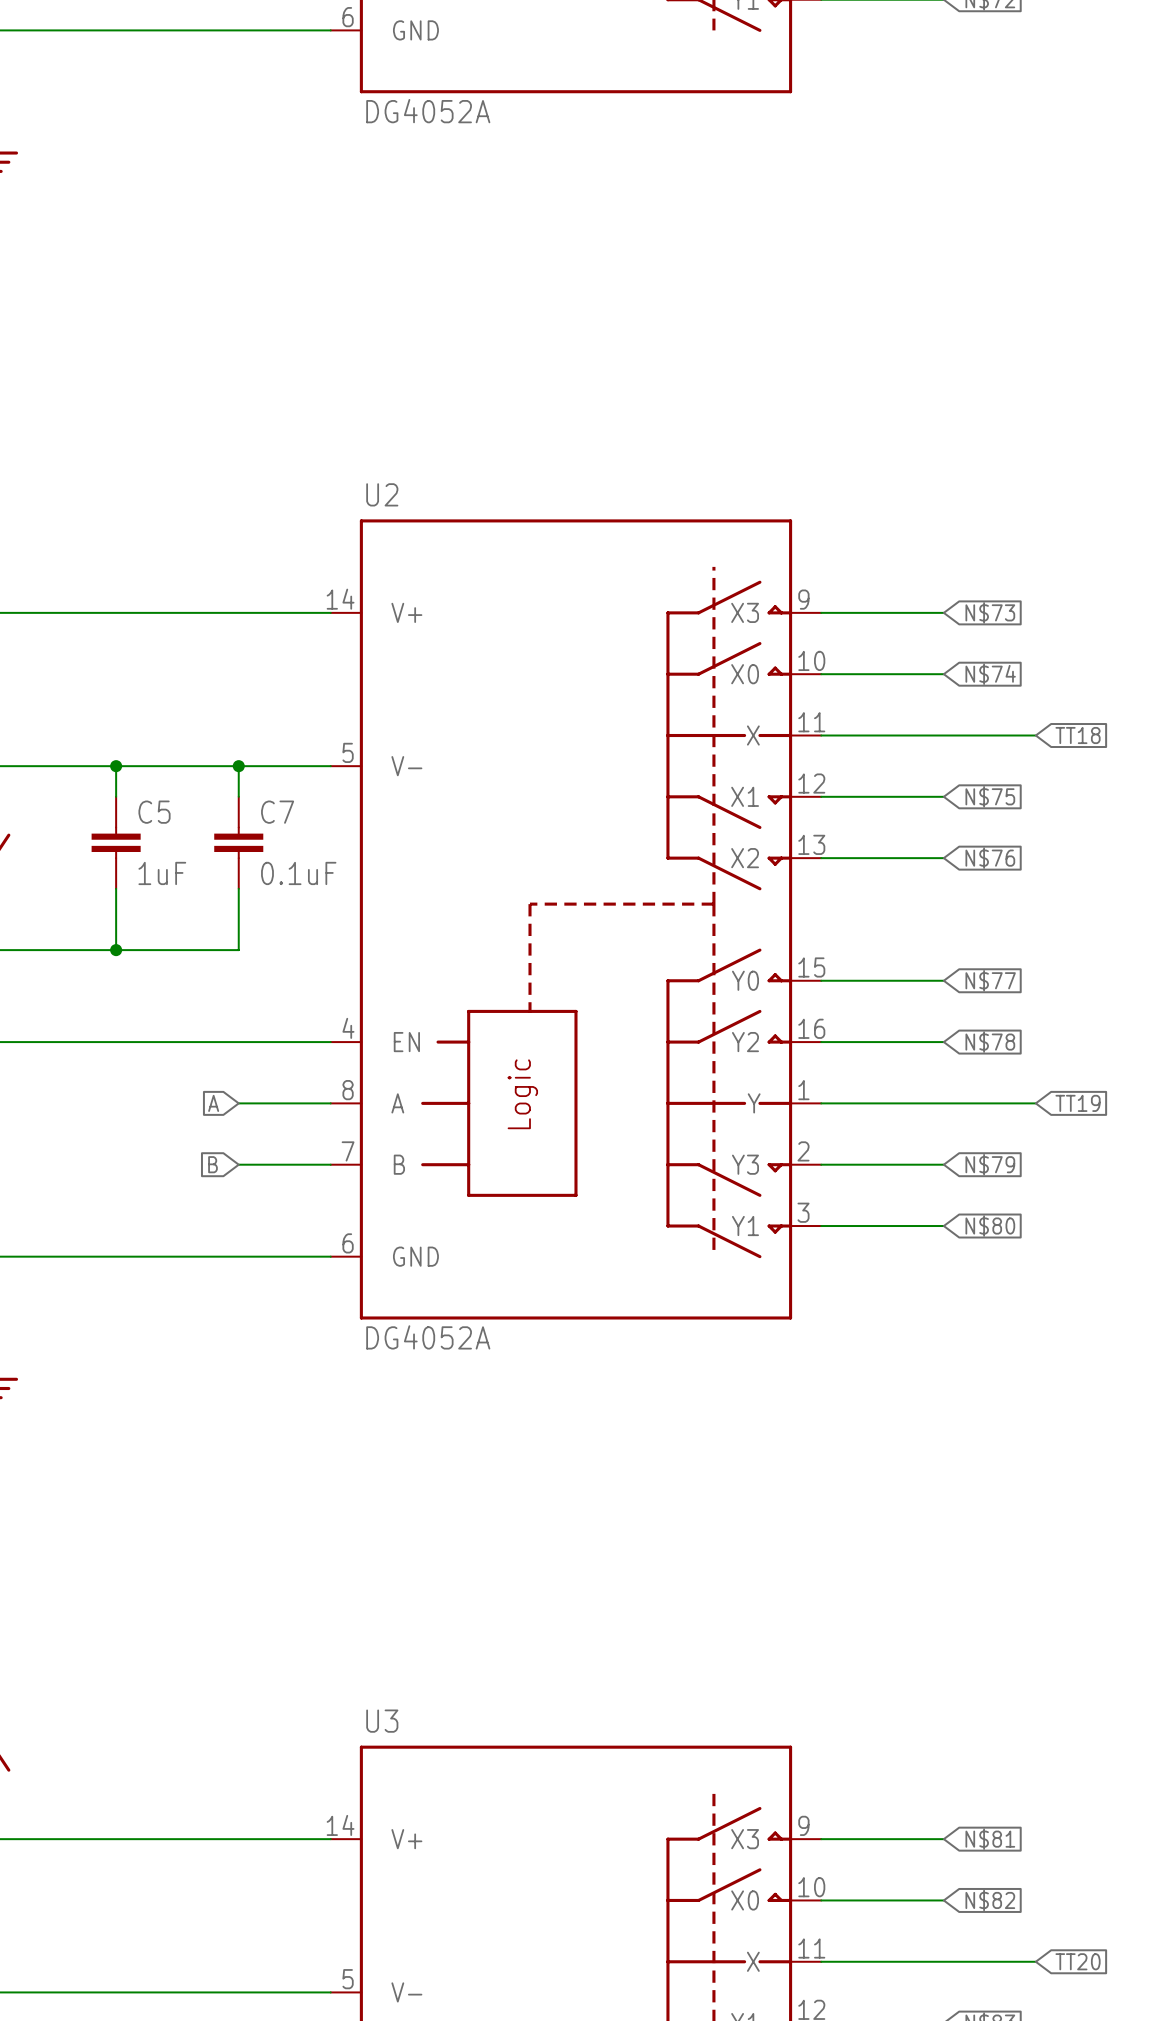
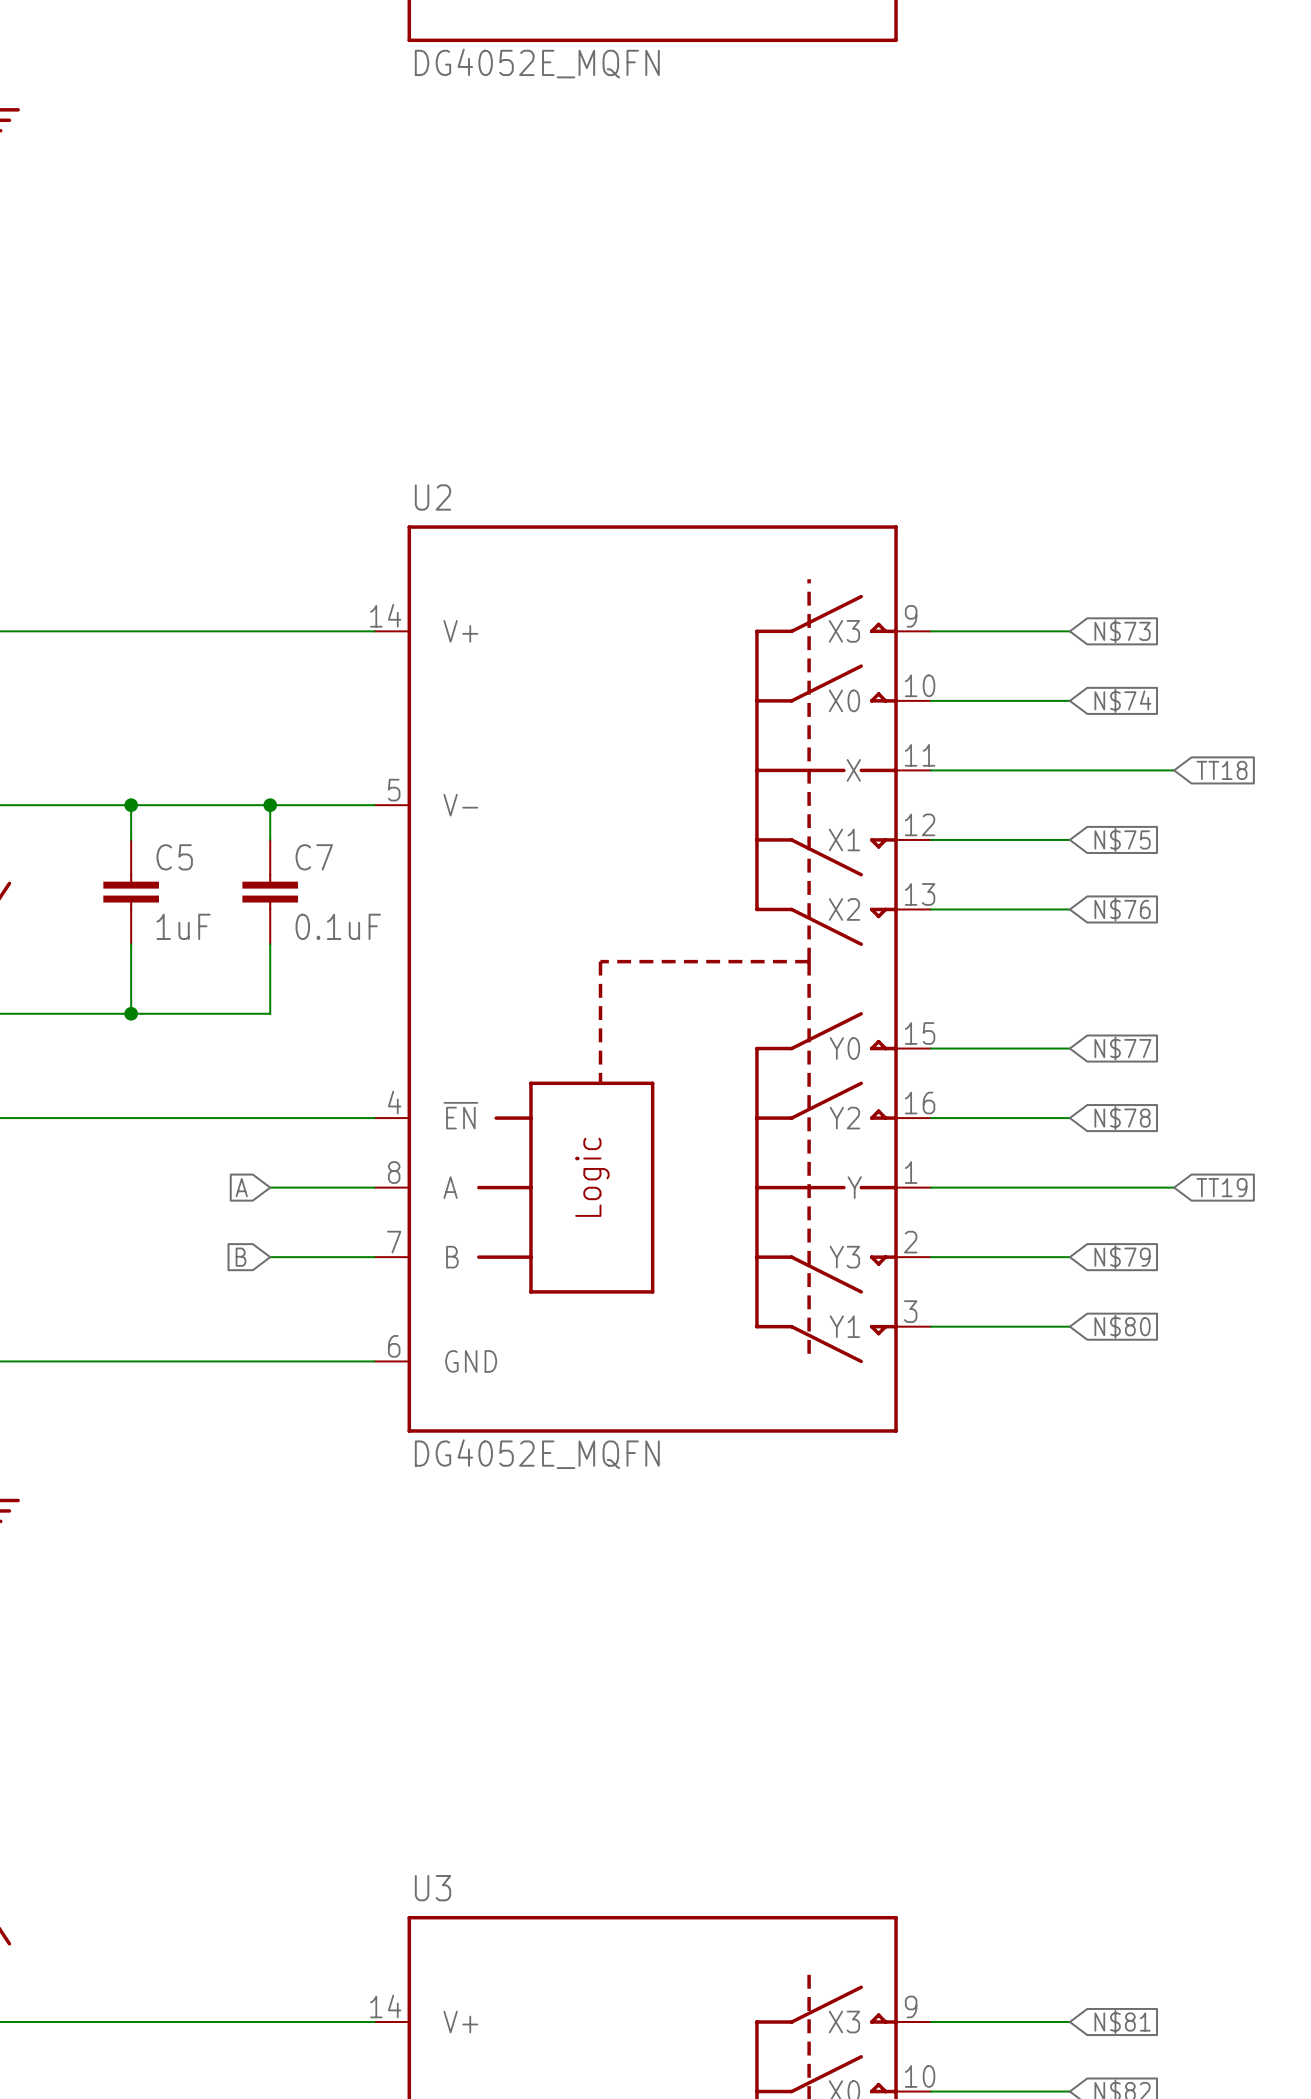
part value: DG4052A (428, 111) -> DG4052E_MQFN (537, 63)
U2 pin name: EN (406, 1042) -> ~{EN} (460, 1115)
U2 value: DG4052A (428, 1337) -> DG4052E_MQFN (537, 1454)

